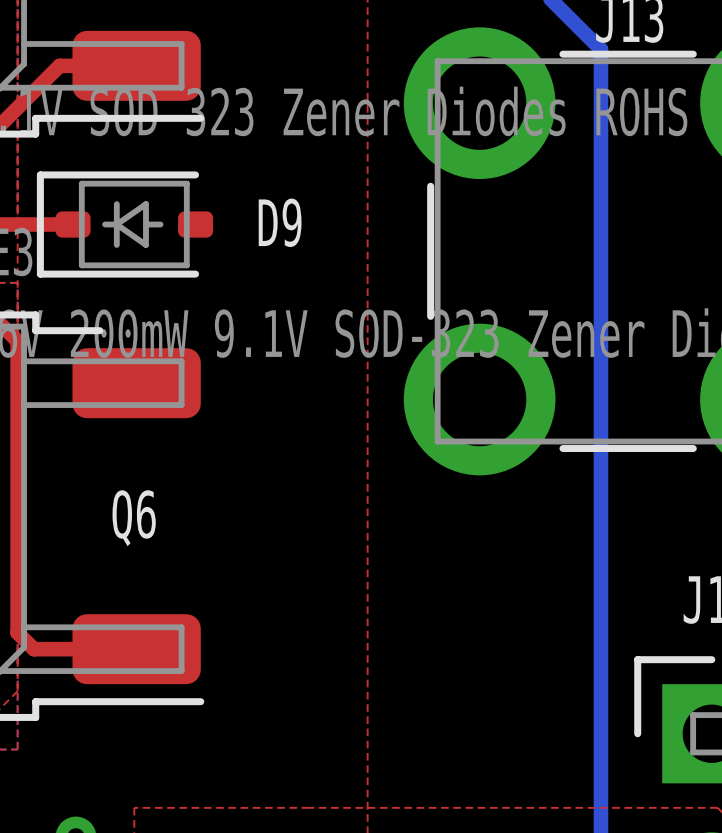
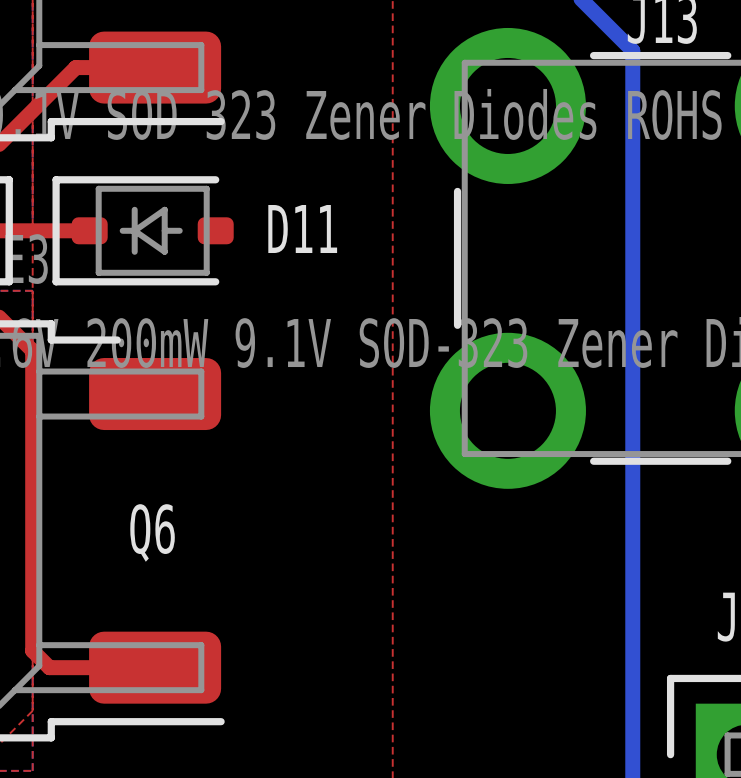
D9 name: D9 (280, 222) -> D11 (302, 229)

